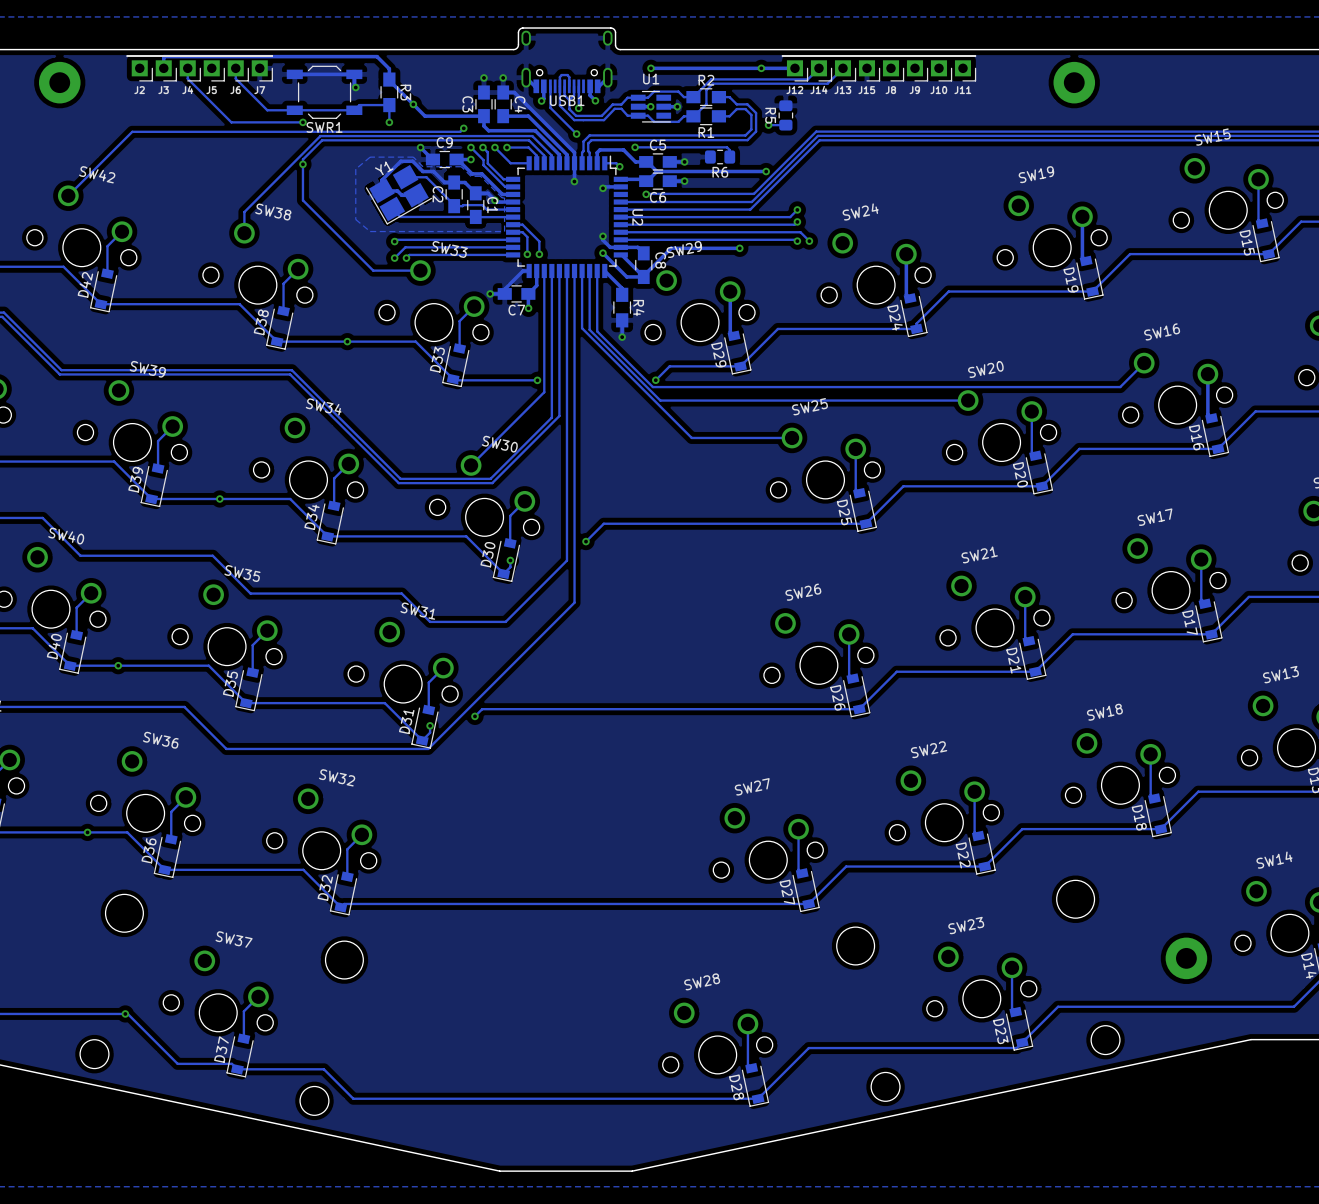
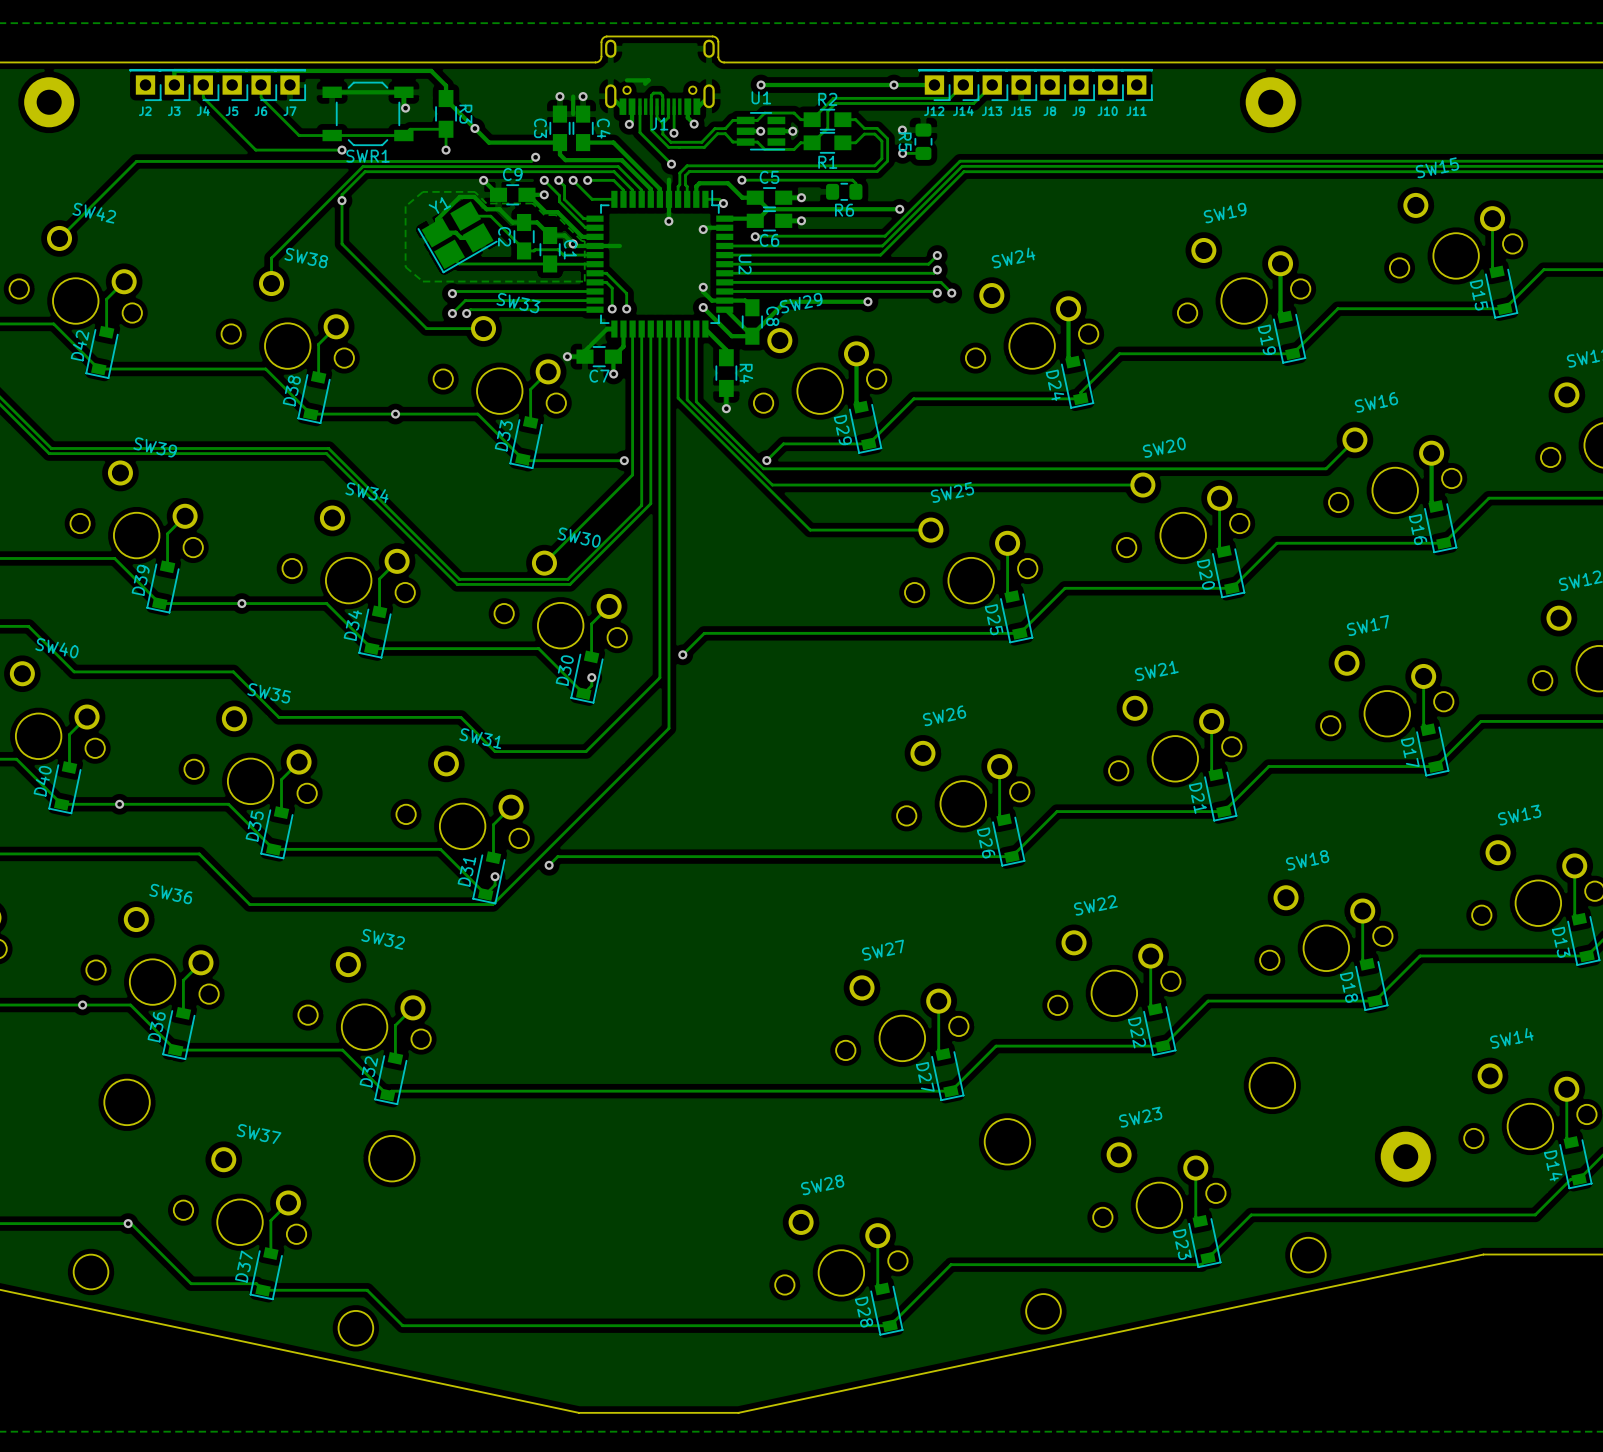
track: none -> (626, 80) (648, 80) (645, 83)
track: none -> (573, 96) (573, 114)
track: (503, 92) (514, 92) (574, 152) -> (669, 179) (669, 186)
USB1 name: USB1 (567, 100) -> J1 (659, 123)
via: none -> (902, 130)
track: none -> (619, 245) (595, 245)

